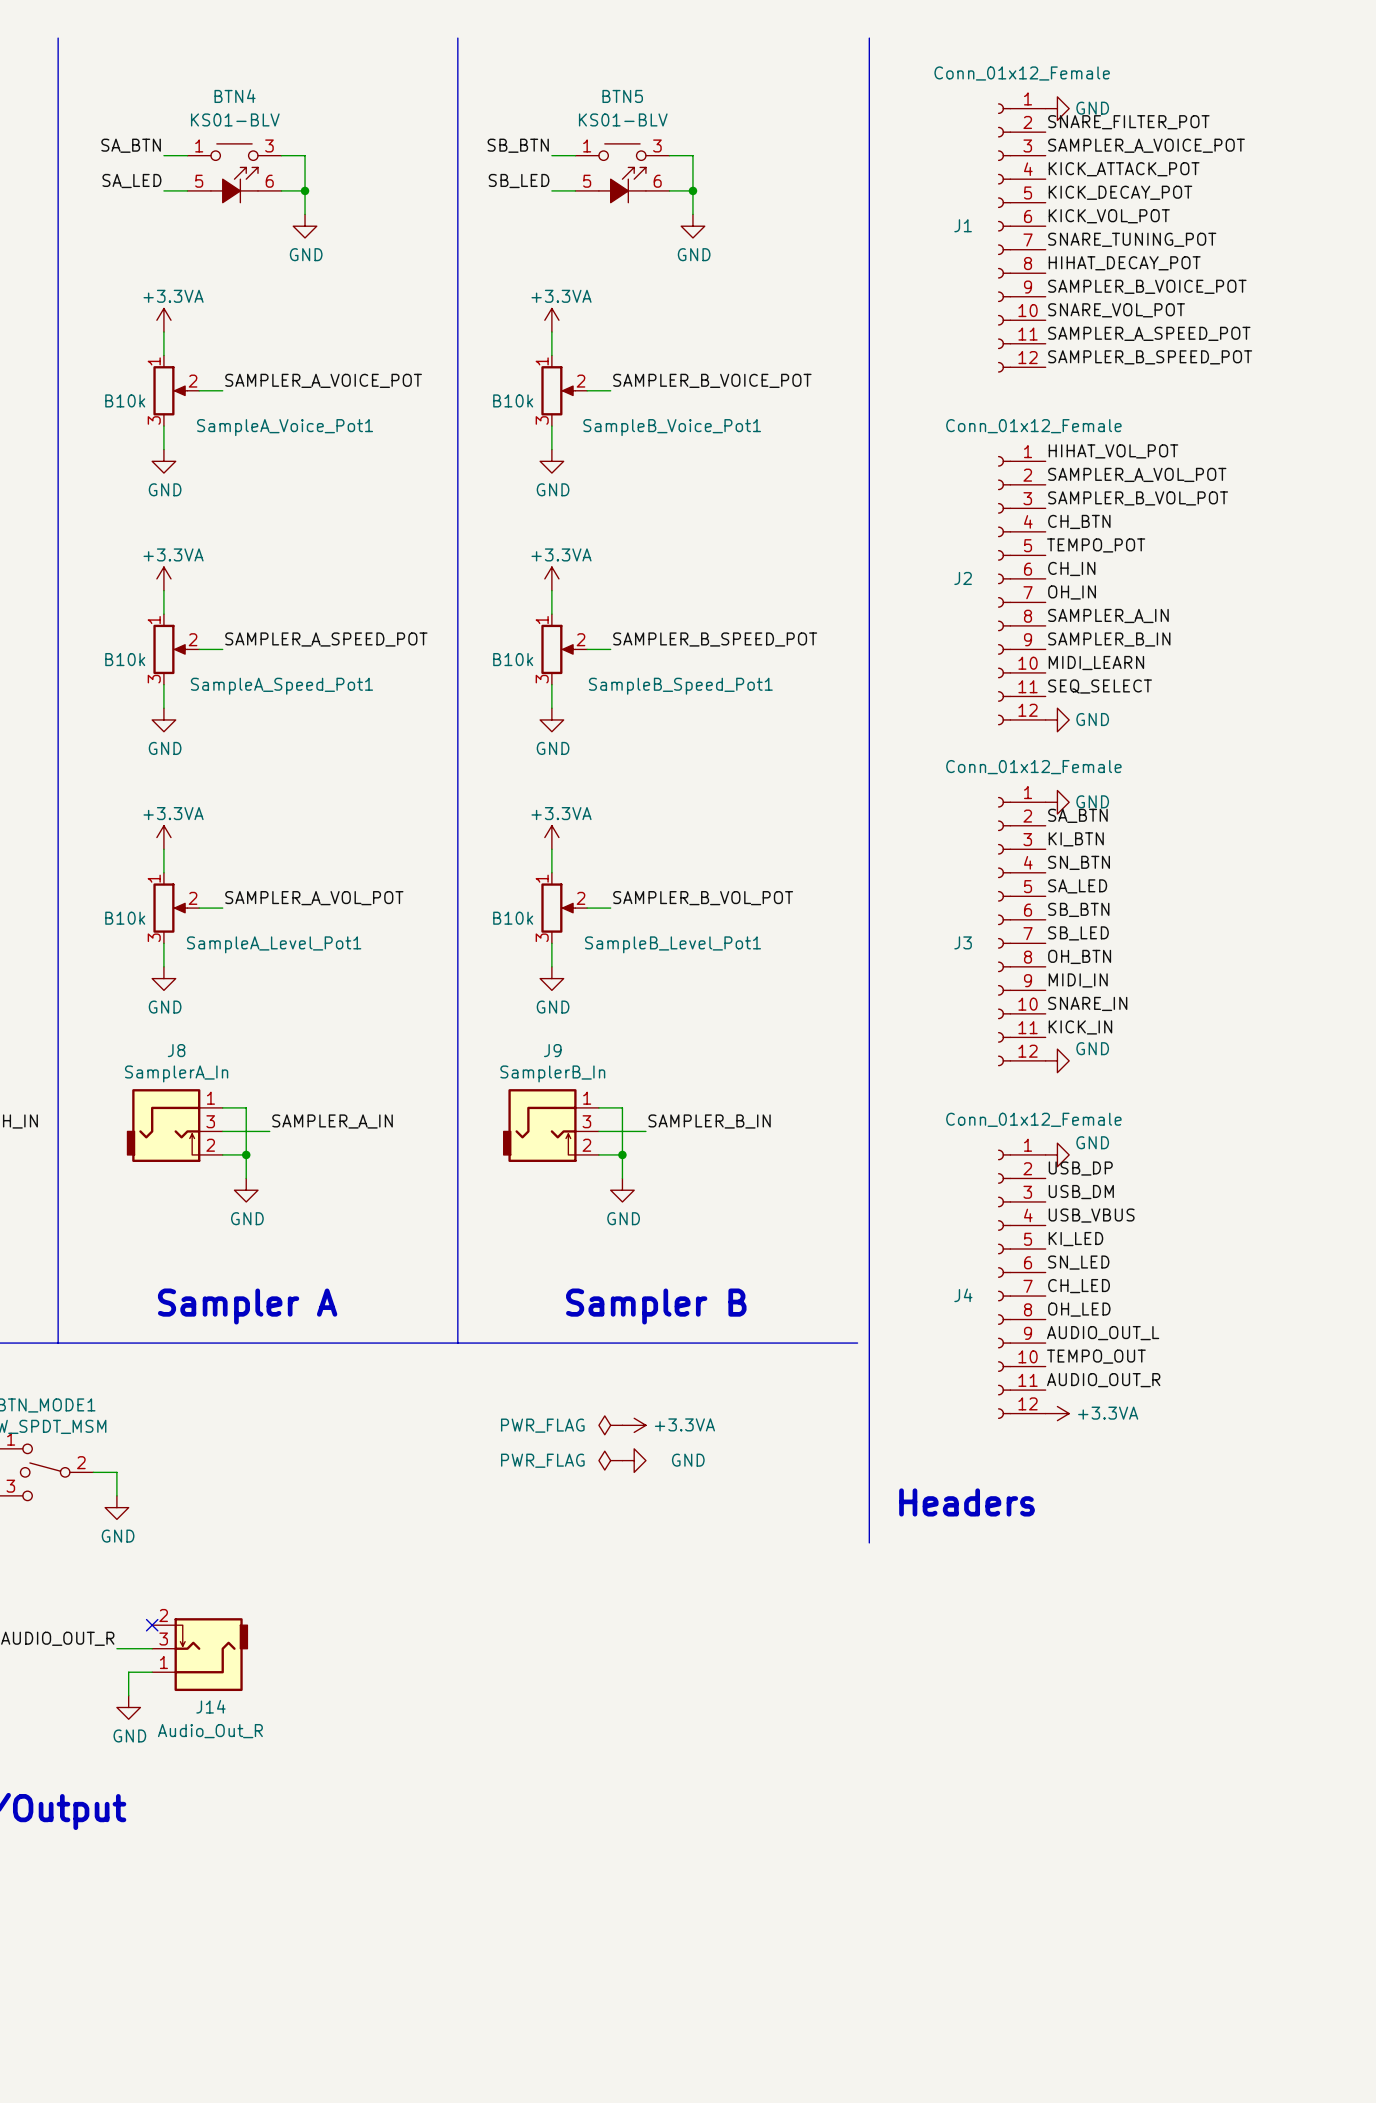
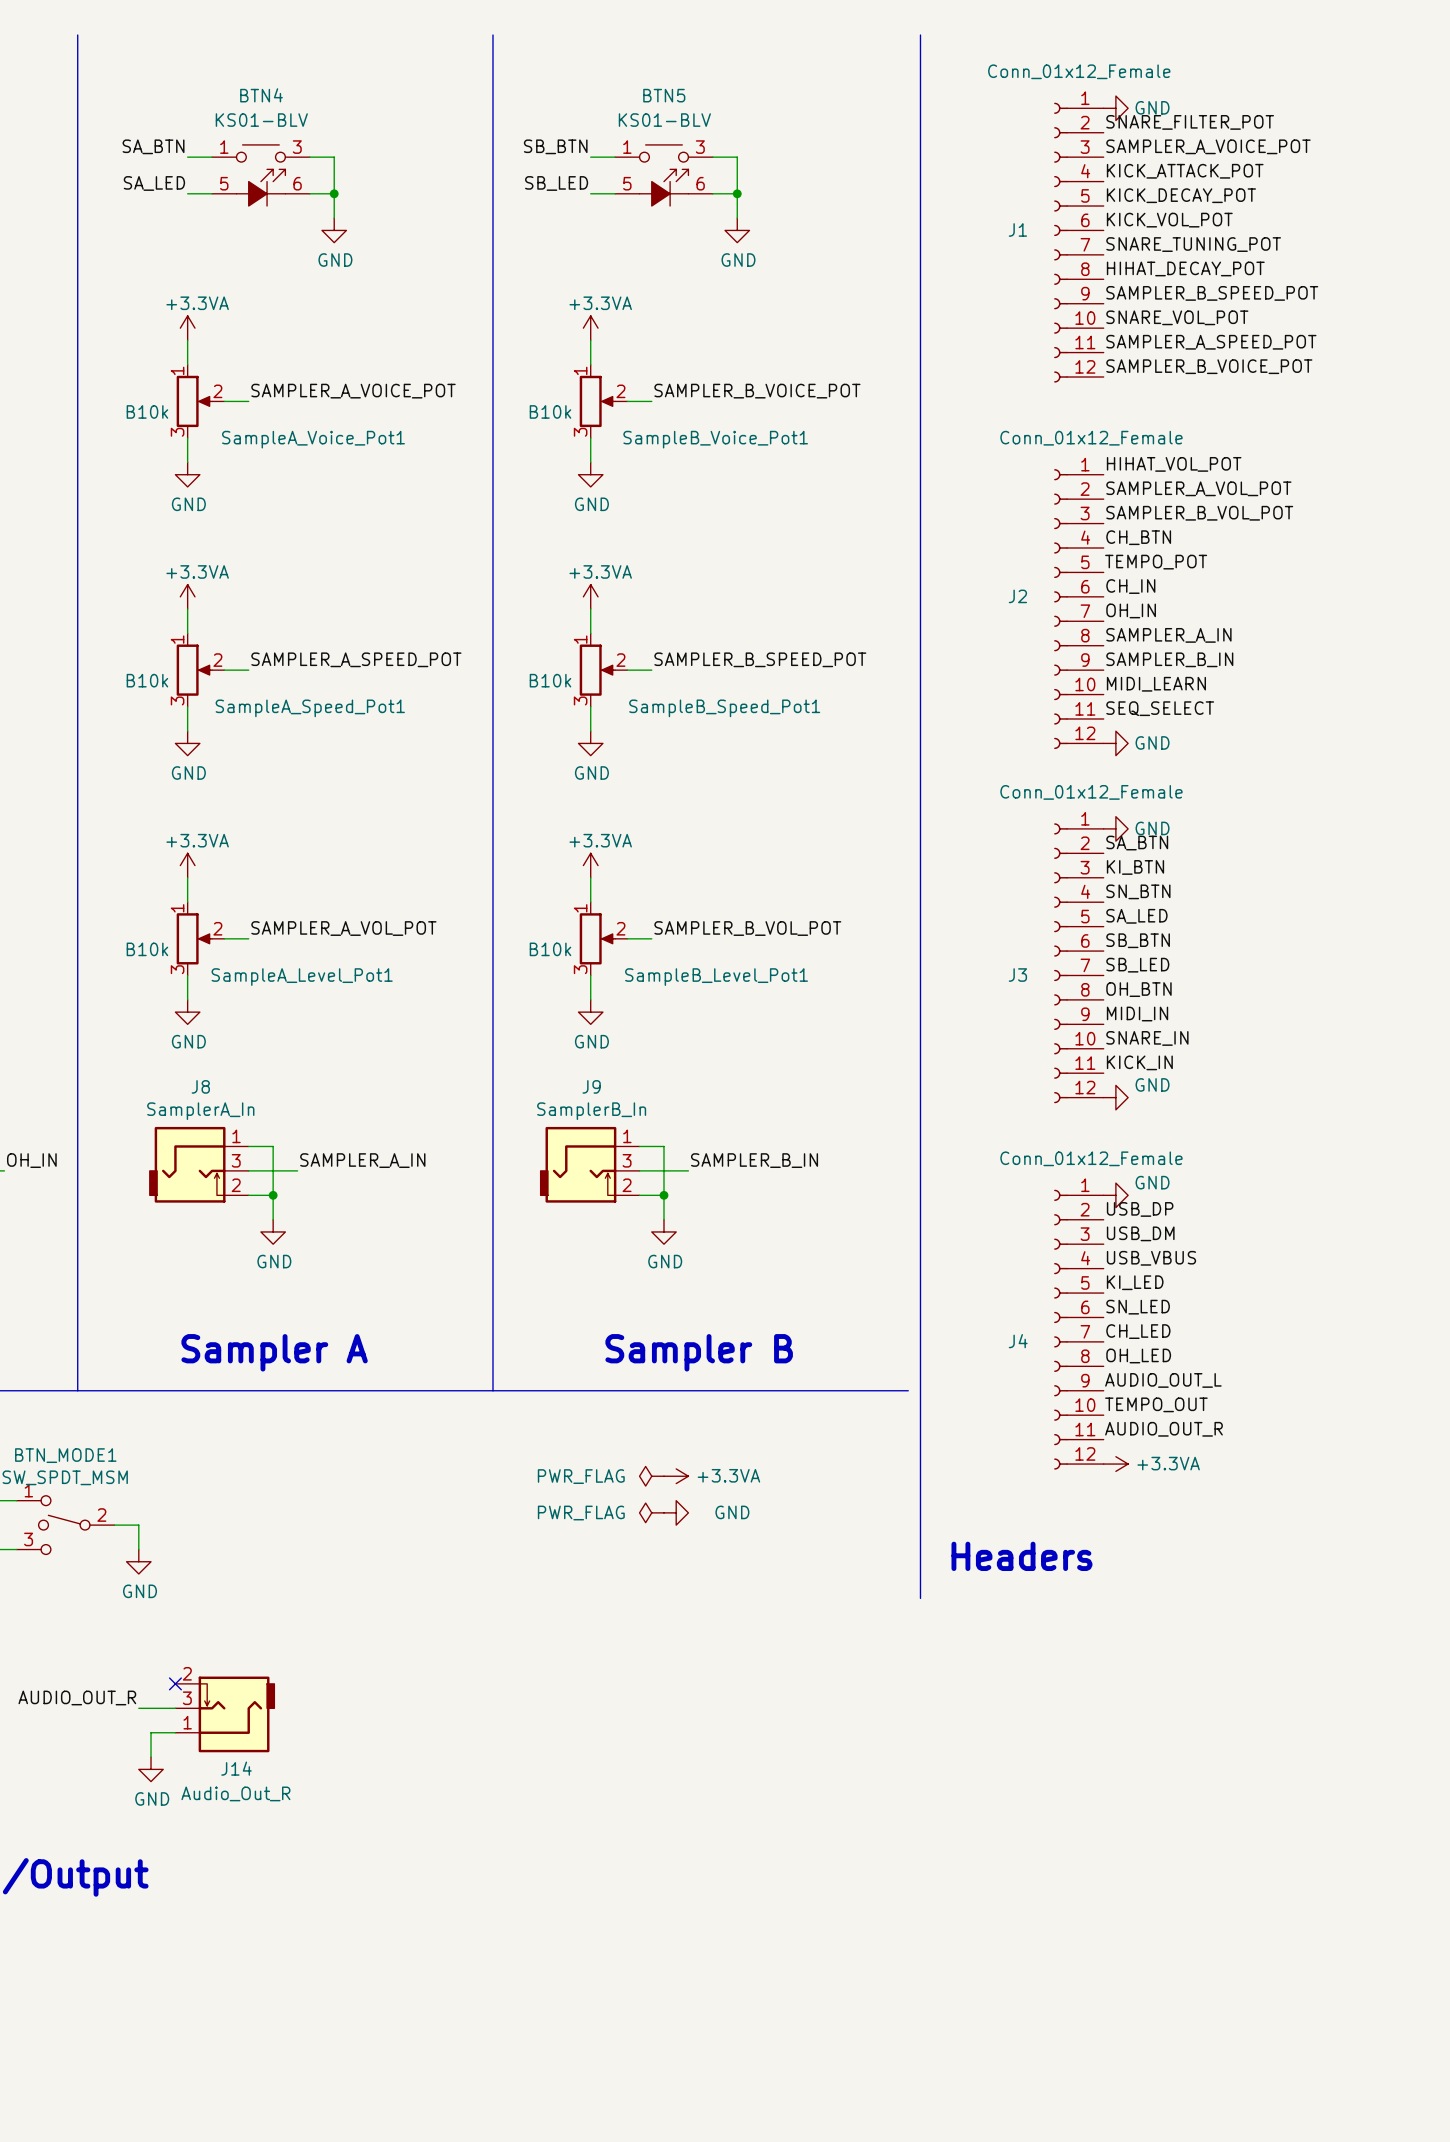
label: SAMPLER_B_VOICE_POT (1147, 286) -> SAMPLER_B_SPEED_POT (1212, 293)
label: SAMPLER_B_SPEED_POT (1150, 357) -> SAMPLER_B_VOICE_POT (1209, 366)

